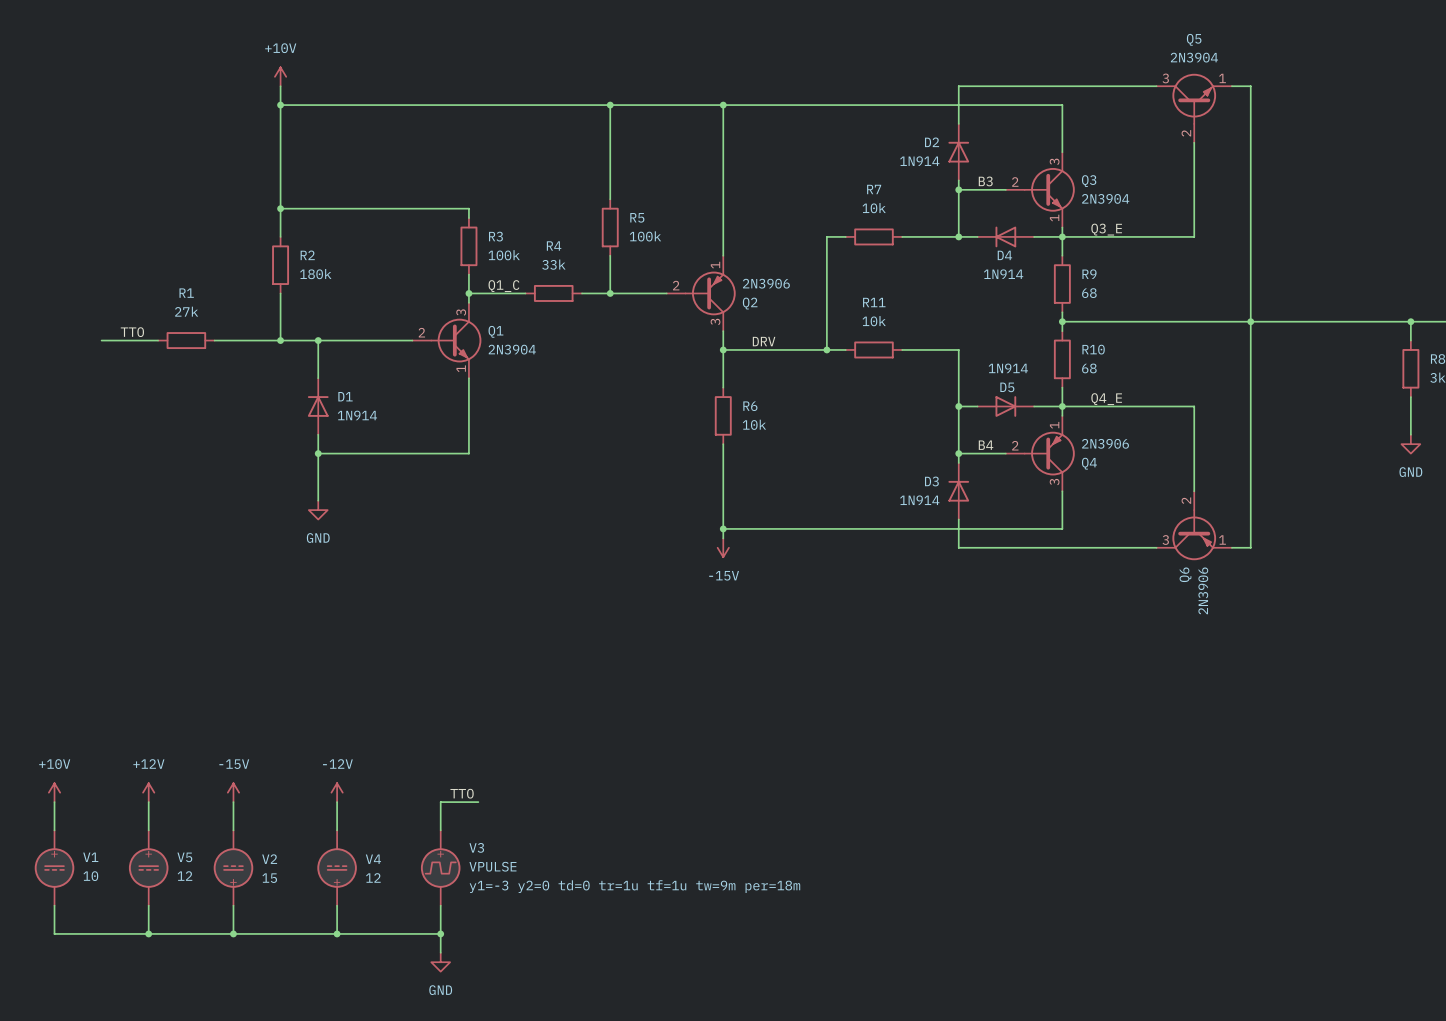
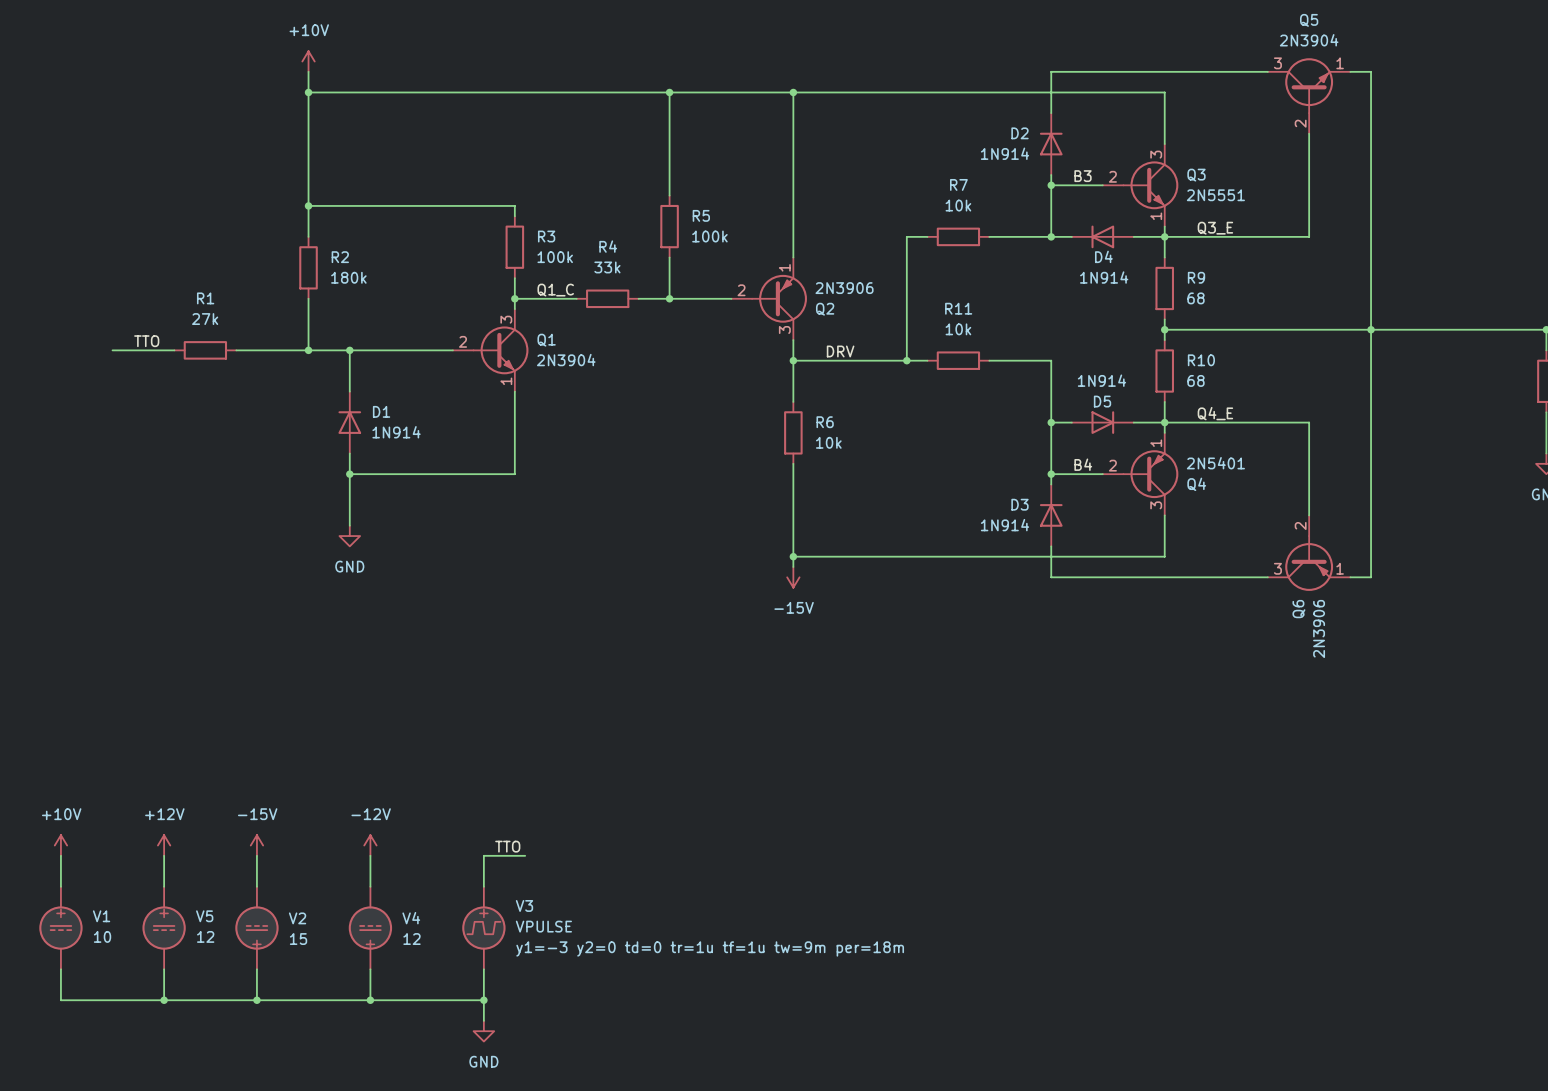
Q3 value: 2N3904 (1105, 198) -> 2N5551 (1215, 195)
Q4 value: 2N3906 (1105, 443) -> 2N5401 (1215, 463)

